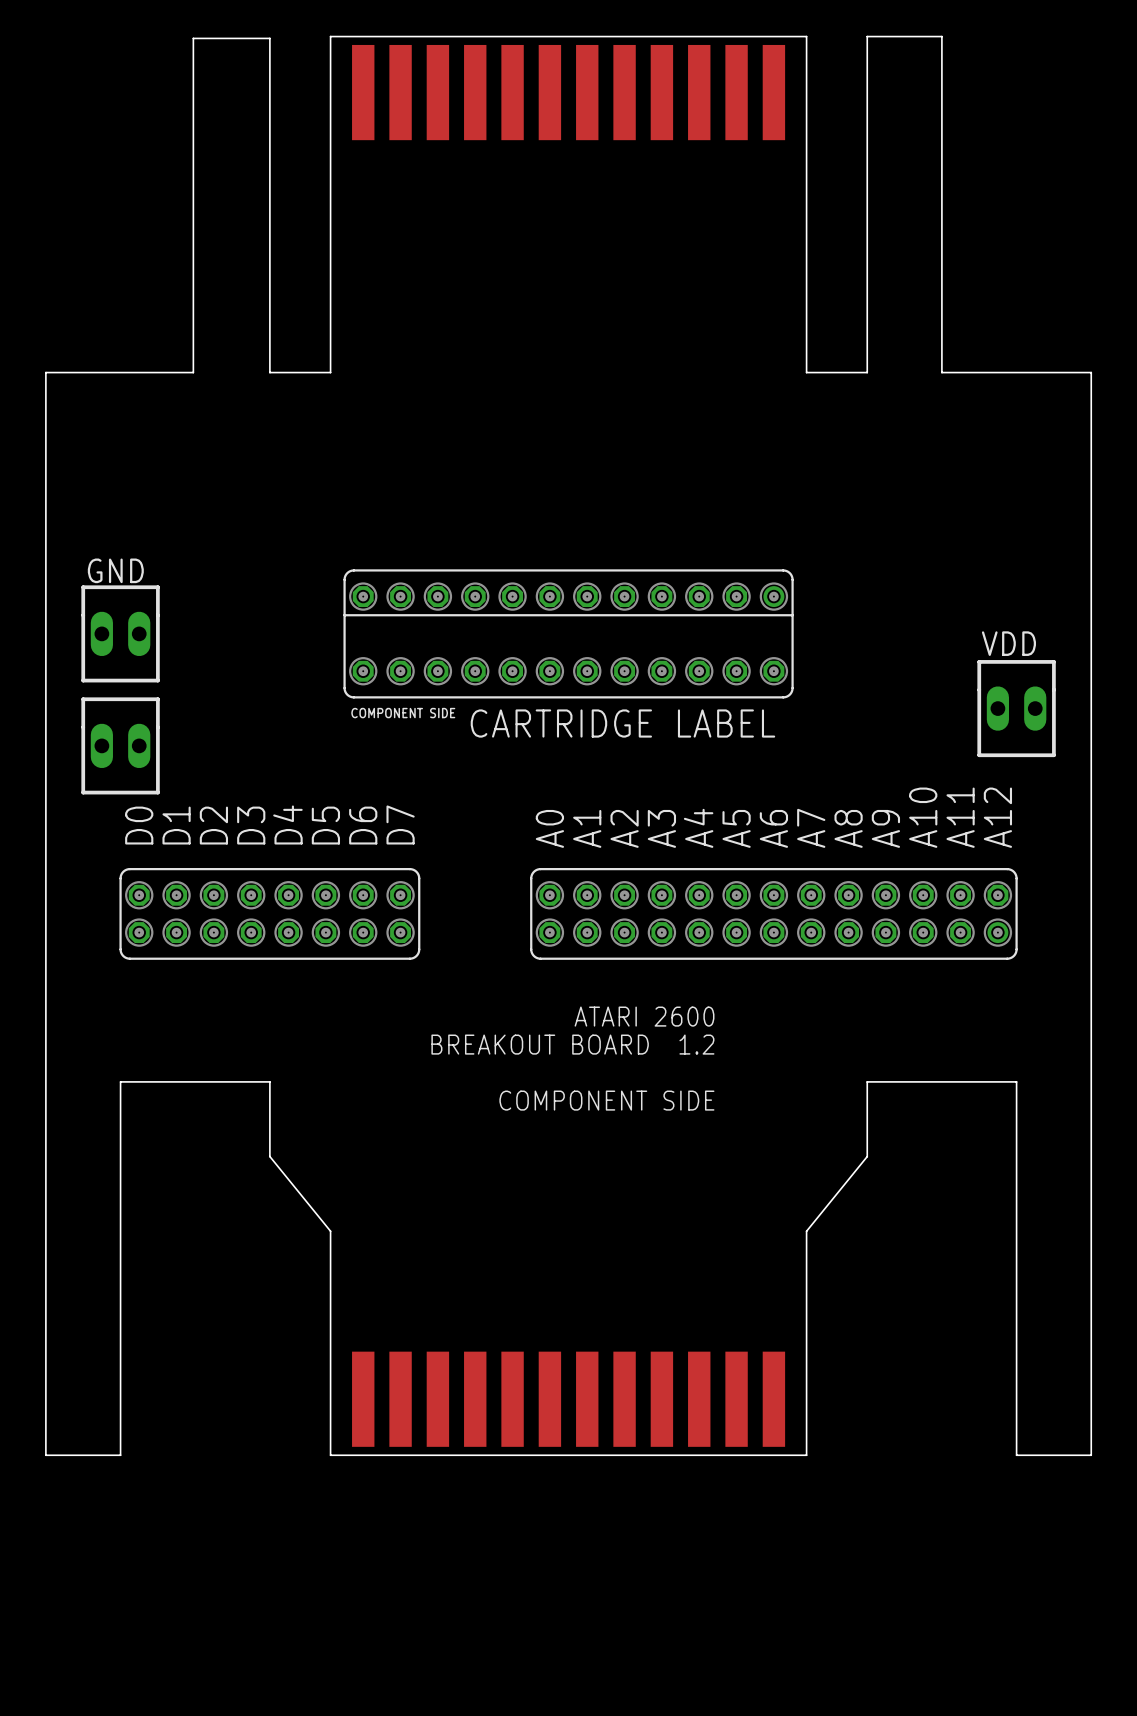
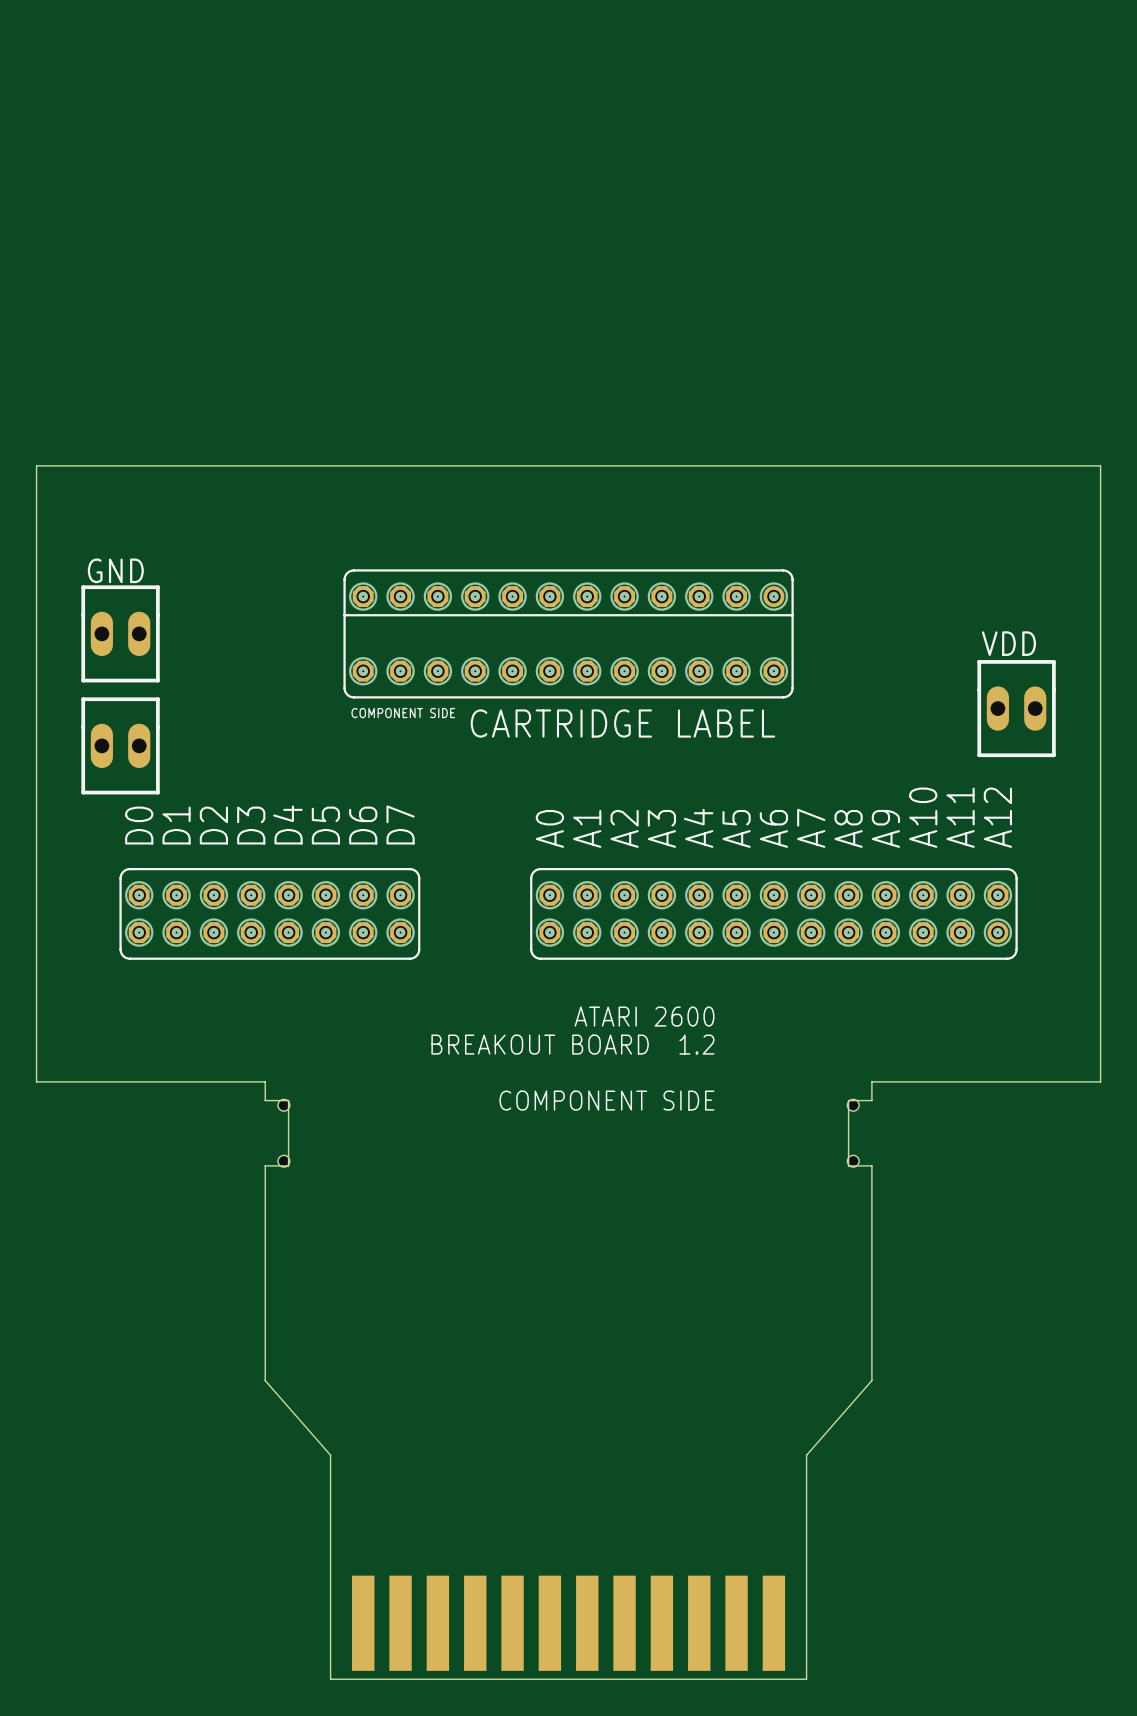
part: (568, 745) -> none
part: none -> (568, 1072)

